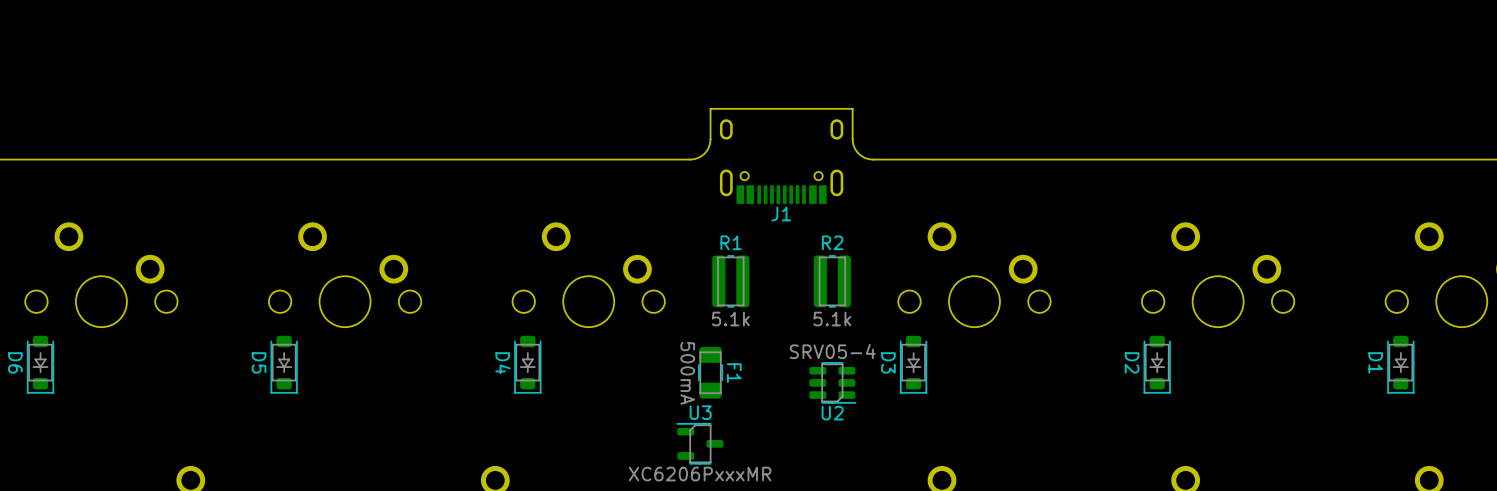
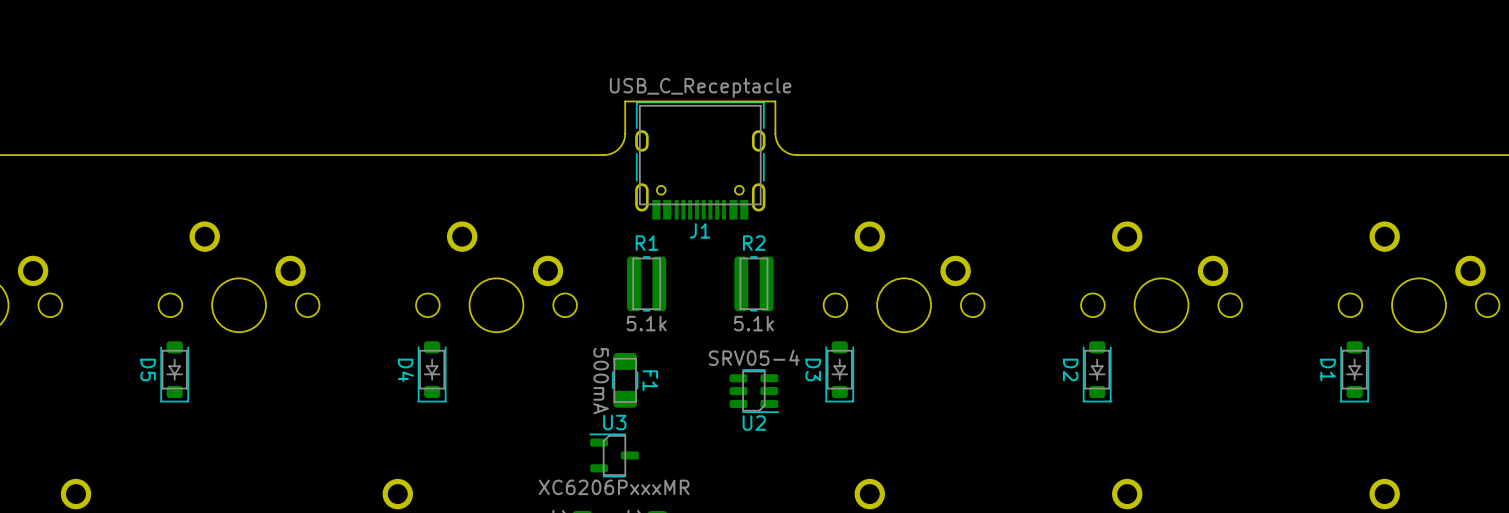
J1 value: none -> USB_C_Receptacle (700, 87)
J1 footprint: [719, 119, 844, 204] -> [635, 101, 766, 220]

